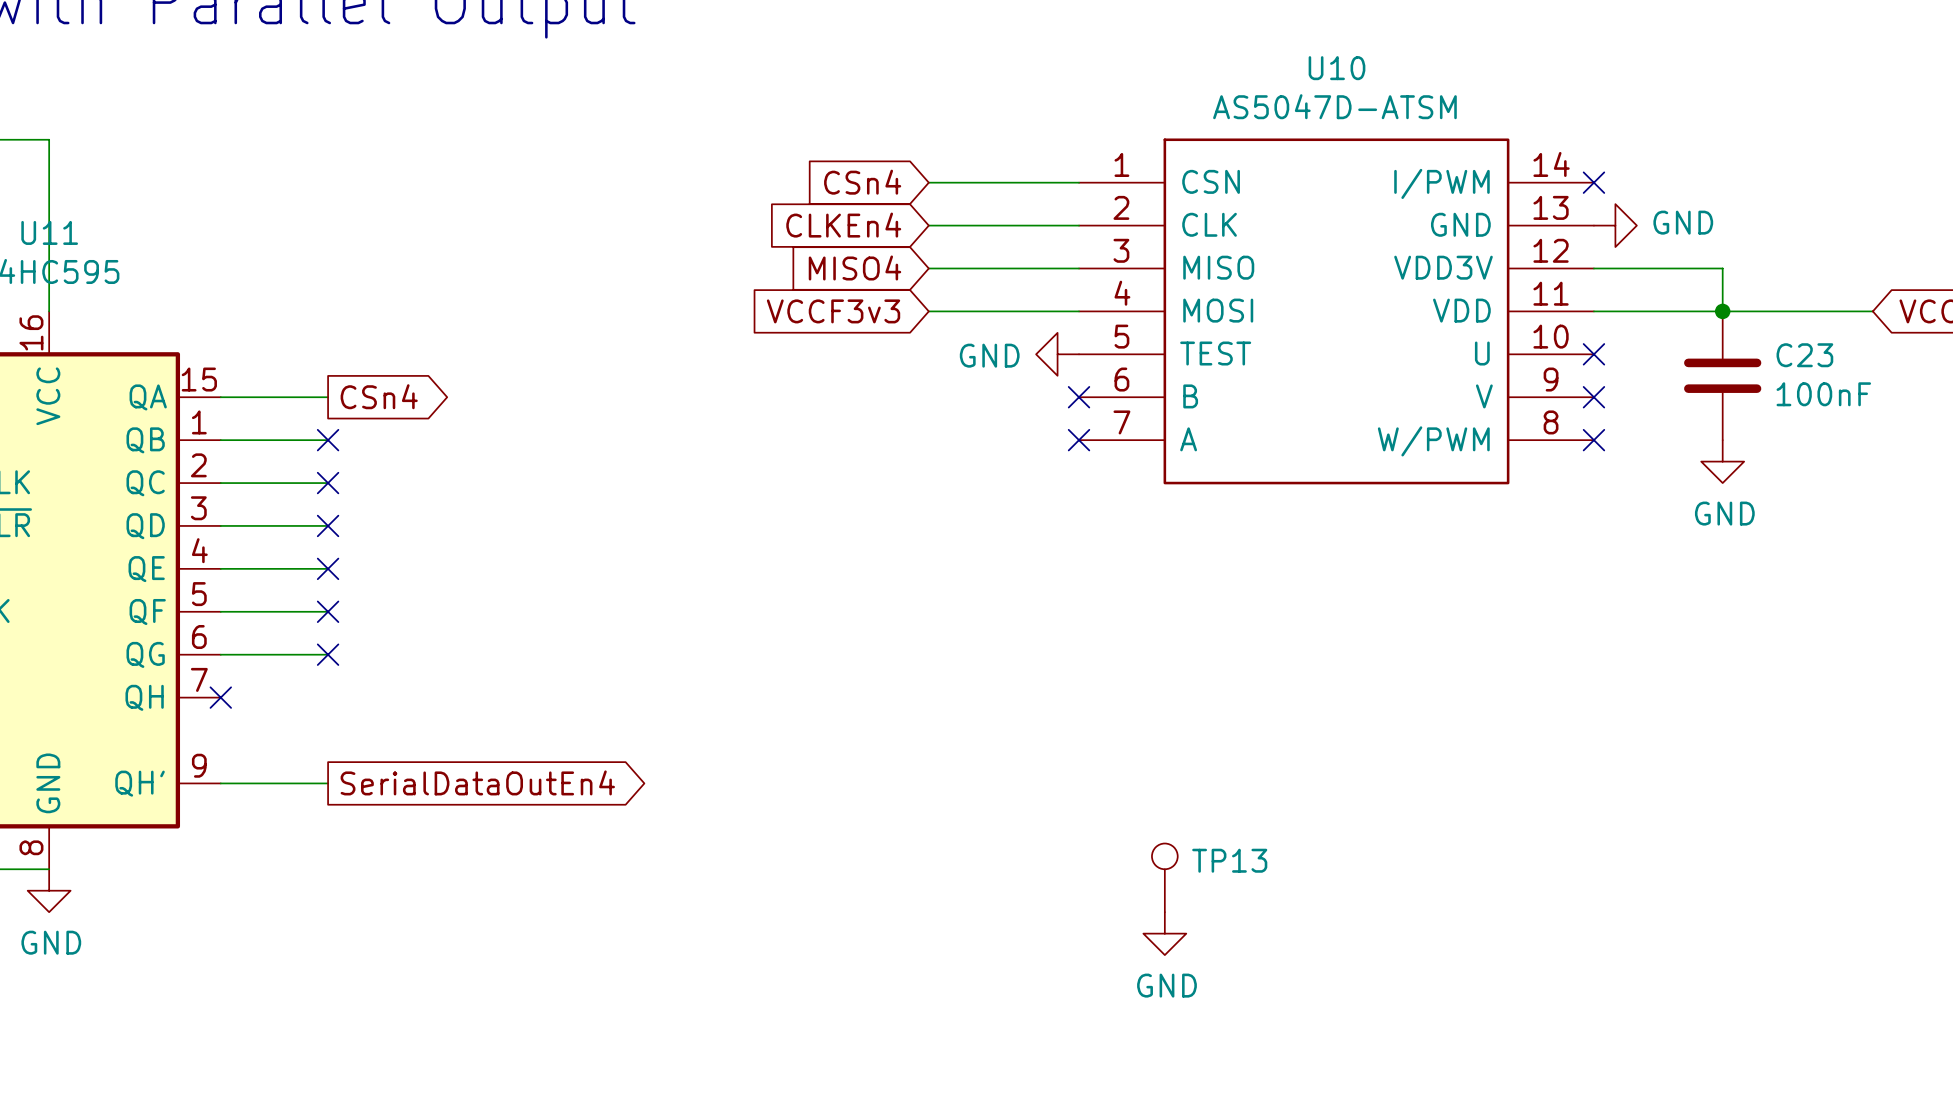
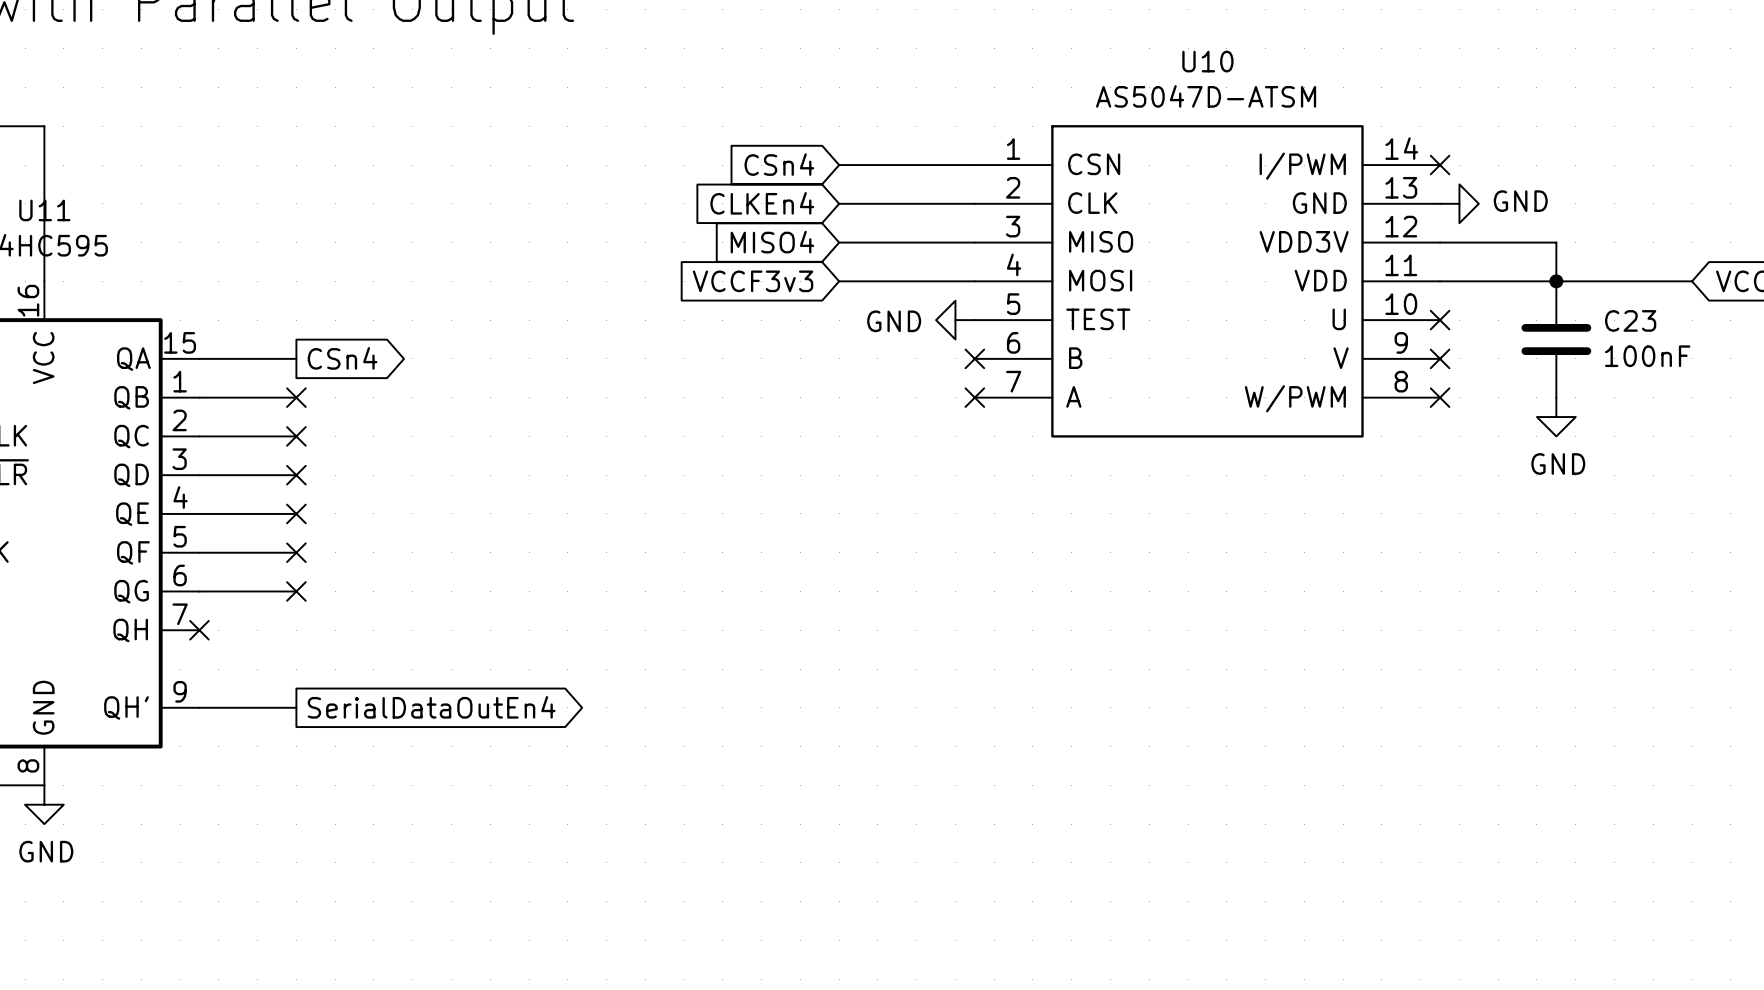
TP13: (1164, 877) -> none
power symbol: GND (1164, 933) -> none

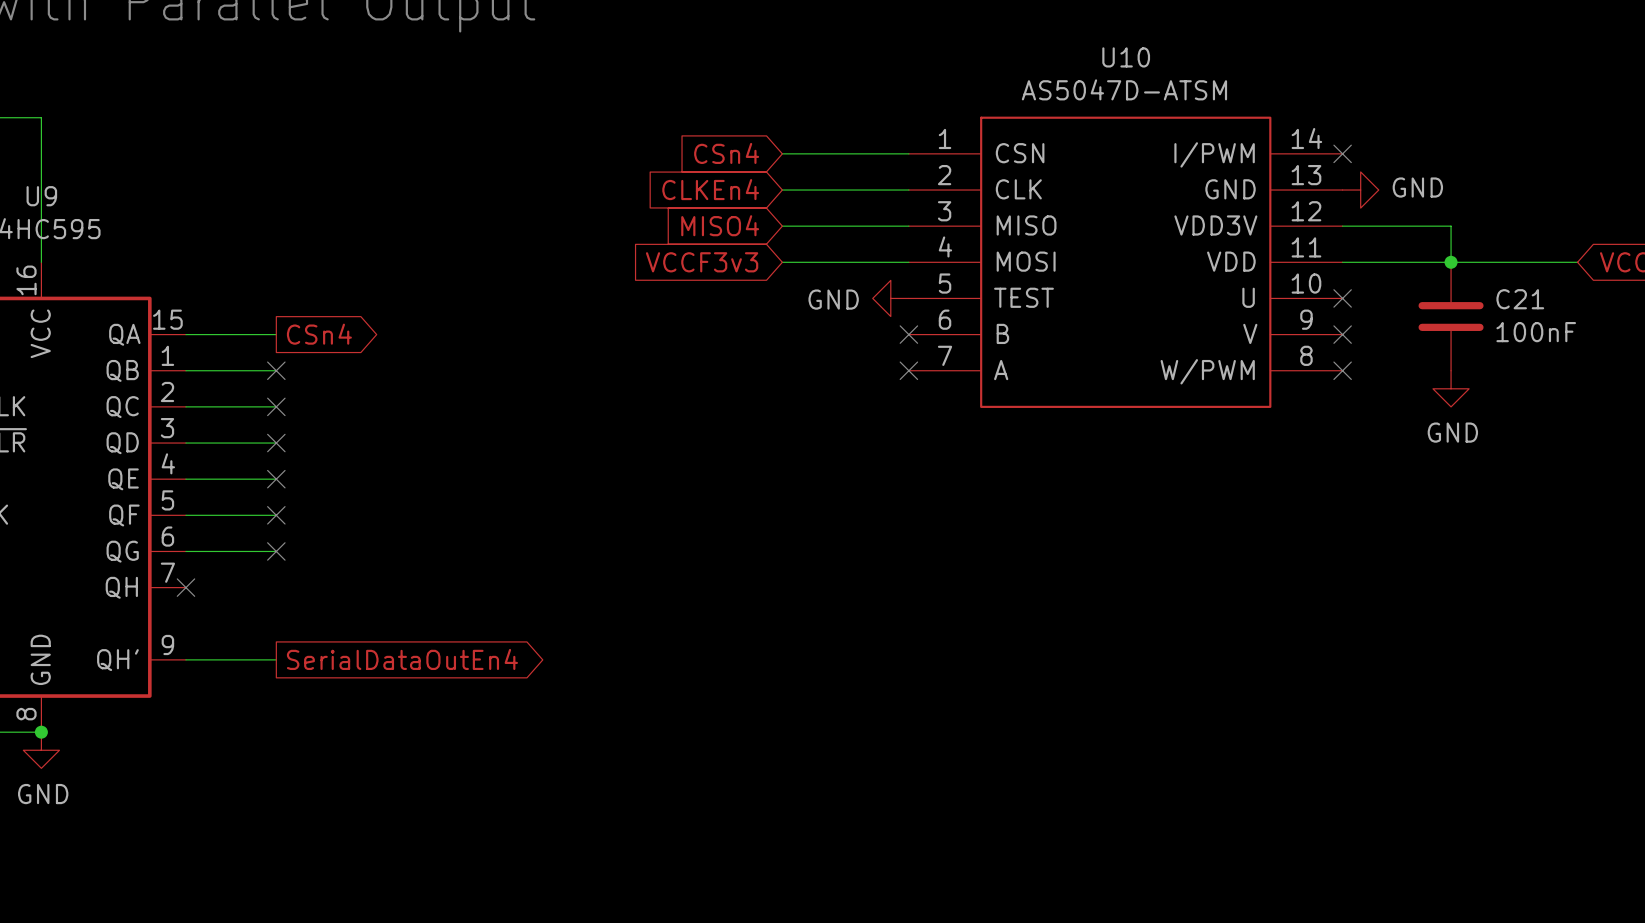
U11 name: U11 (44, 210) -> U9 (41, 196)
C23 name: C23 (1630, 320) -> C21 (1520, 299)
junction: none -> (41, 732)

